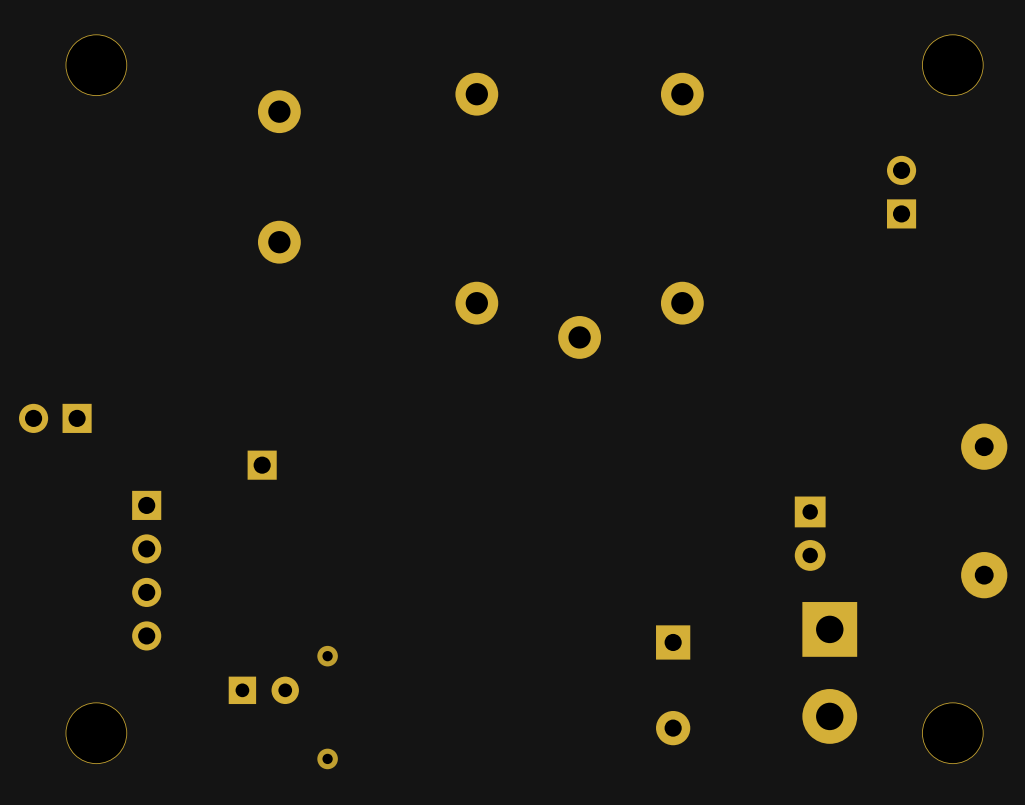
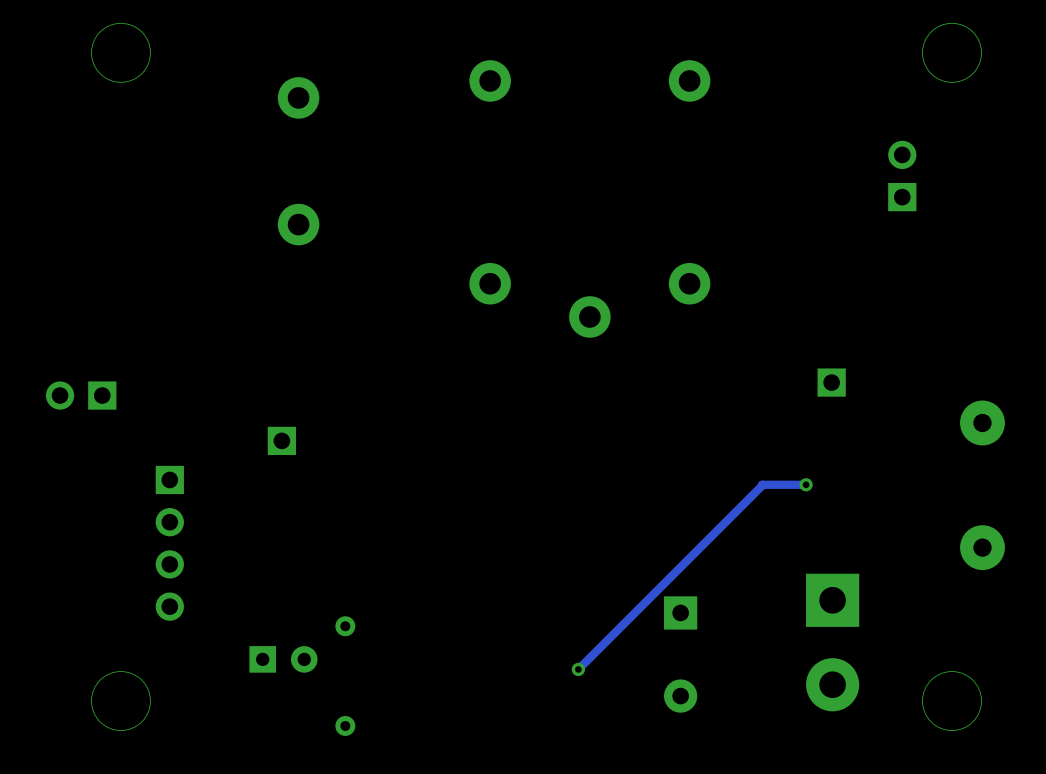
part: none -> (831, 382)
track: none -> (806, 484) (762, 484) (578, 669)
via: none -> (806, 484)
part: (810, 533) -> none
via: none -> (578, 669)

